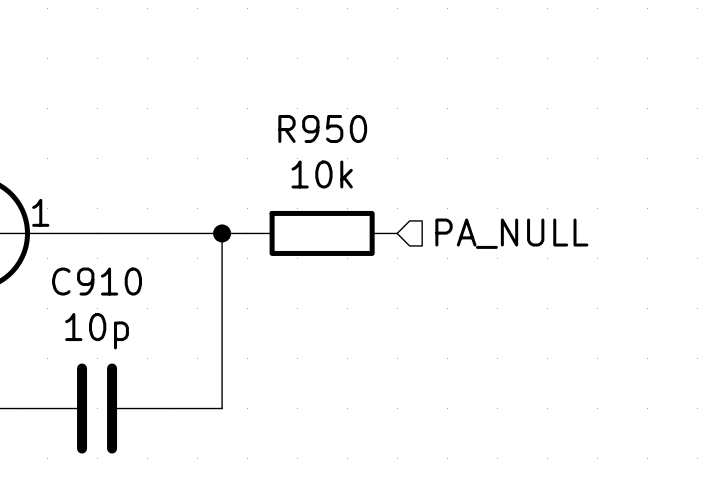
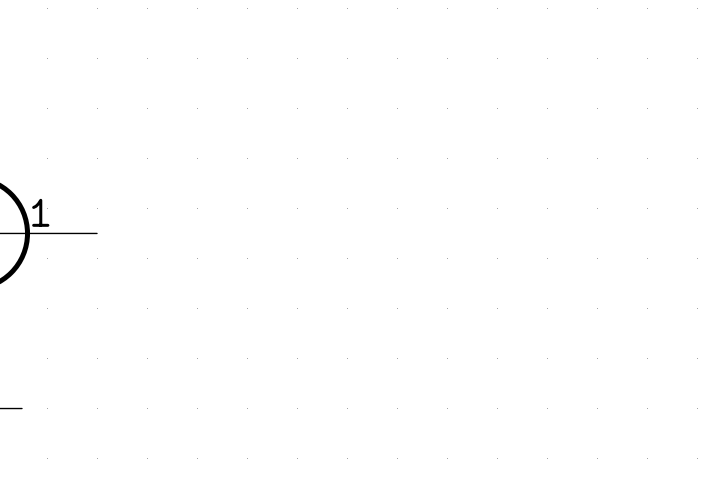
wire: (97, 233) (247, 233) -> none
wire: (222, 233) (222, 408) (172, 408) -> none
junction: (222, 233) -> none
R950: 10k (322, 233) -> none
hierarchical label: PA_NULL (511, 233) -> none
C910: 10p (97, 408) -> none

